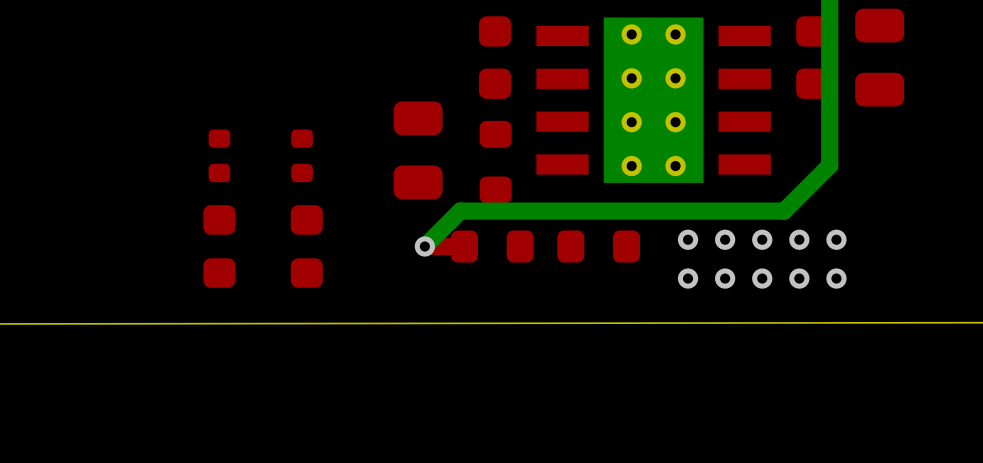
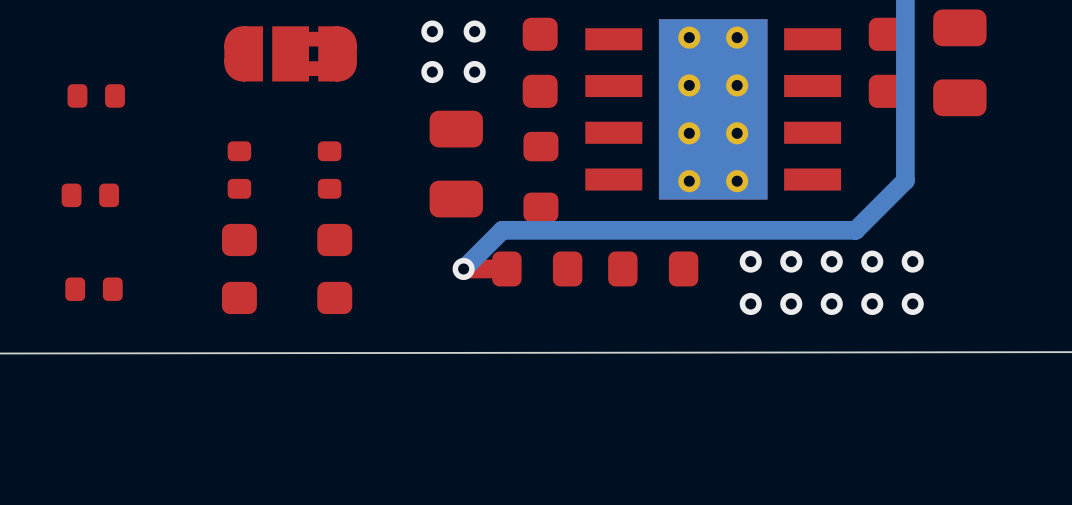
via: none -> (432, 31)
via: none -> (474, 31)
part: none -> (290, 53)
via: none -> (432, 72)
via: none -> (474, 72)
part: none -> (96, 95)
part: none -> (90, 195)
part: none -> (94, 289)

